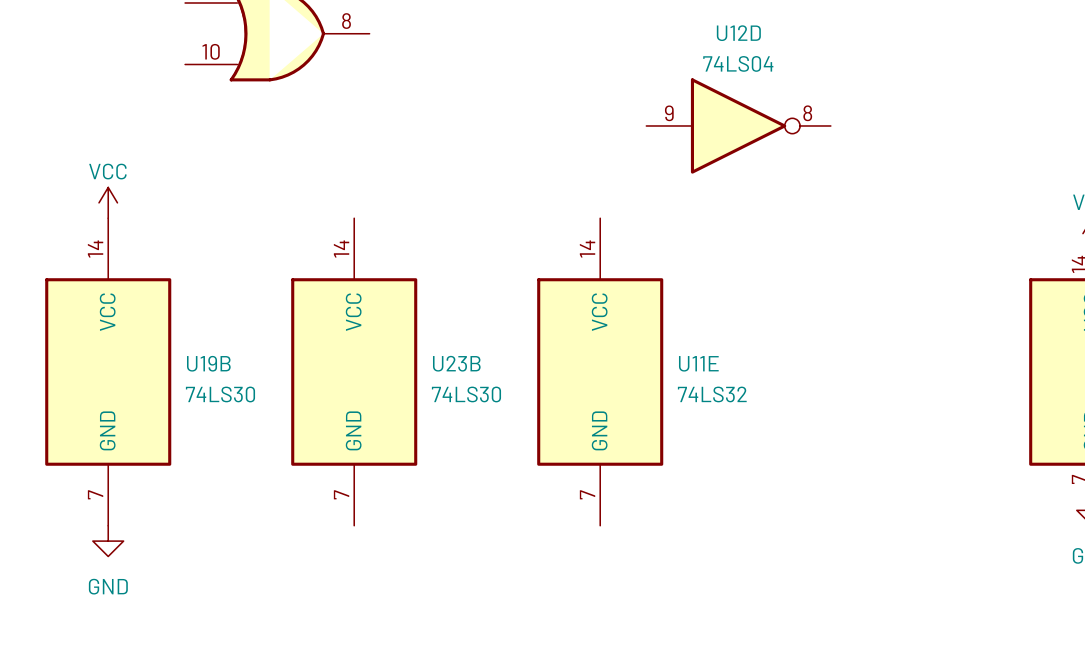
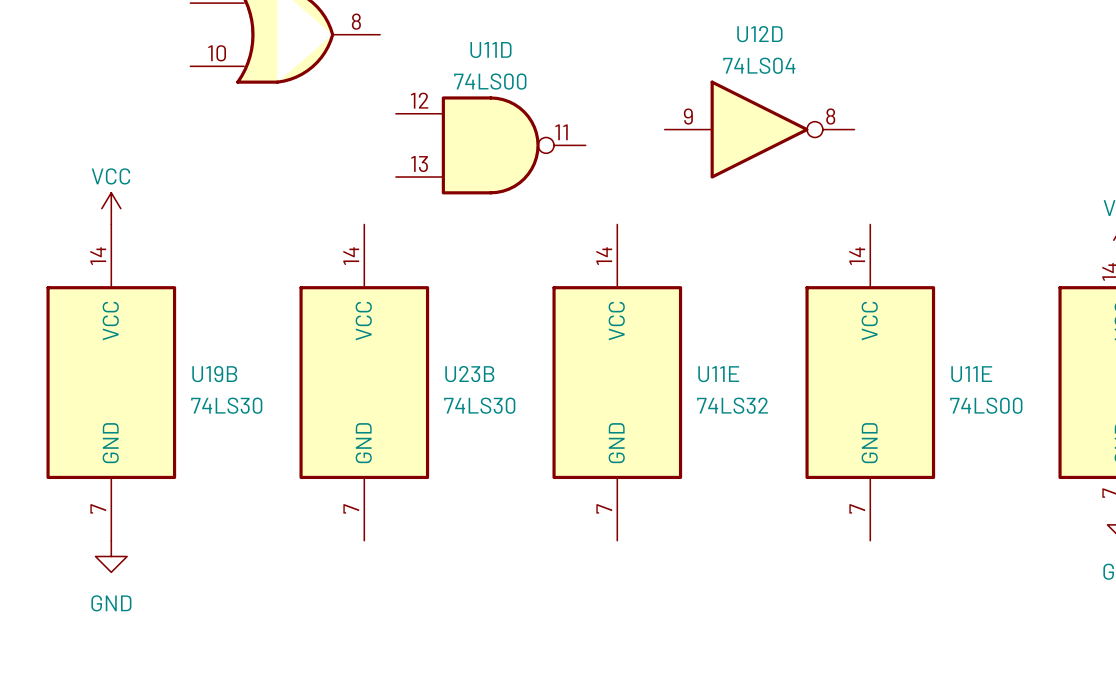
U11D: none -> 74LS00 (490, 145)
U11E: none -> 74LS00 (870, 382)

